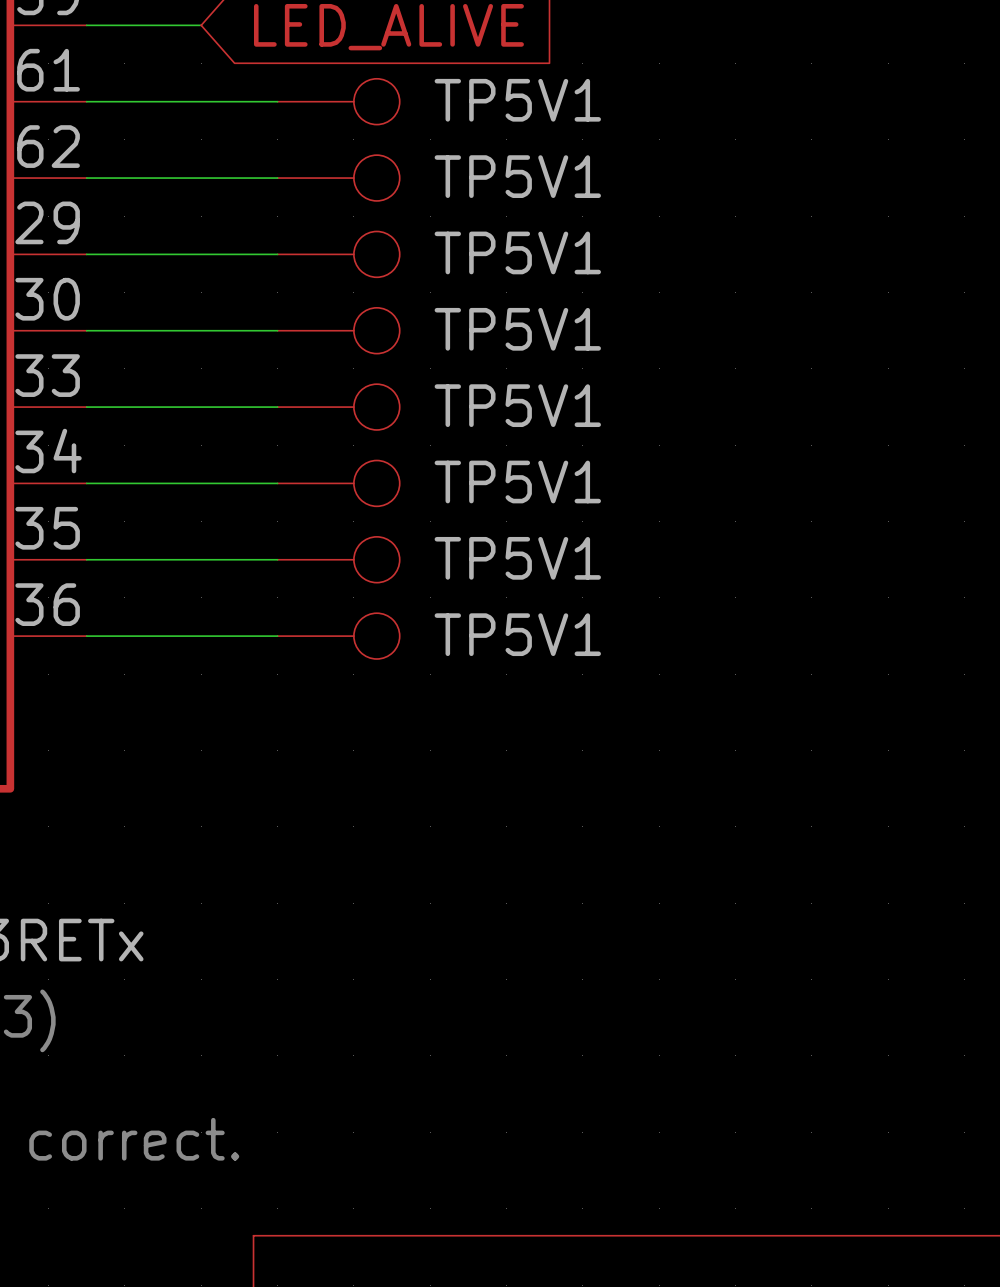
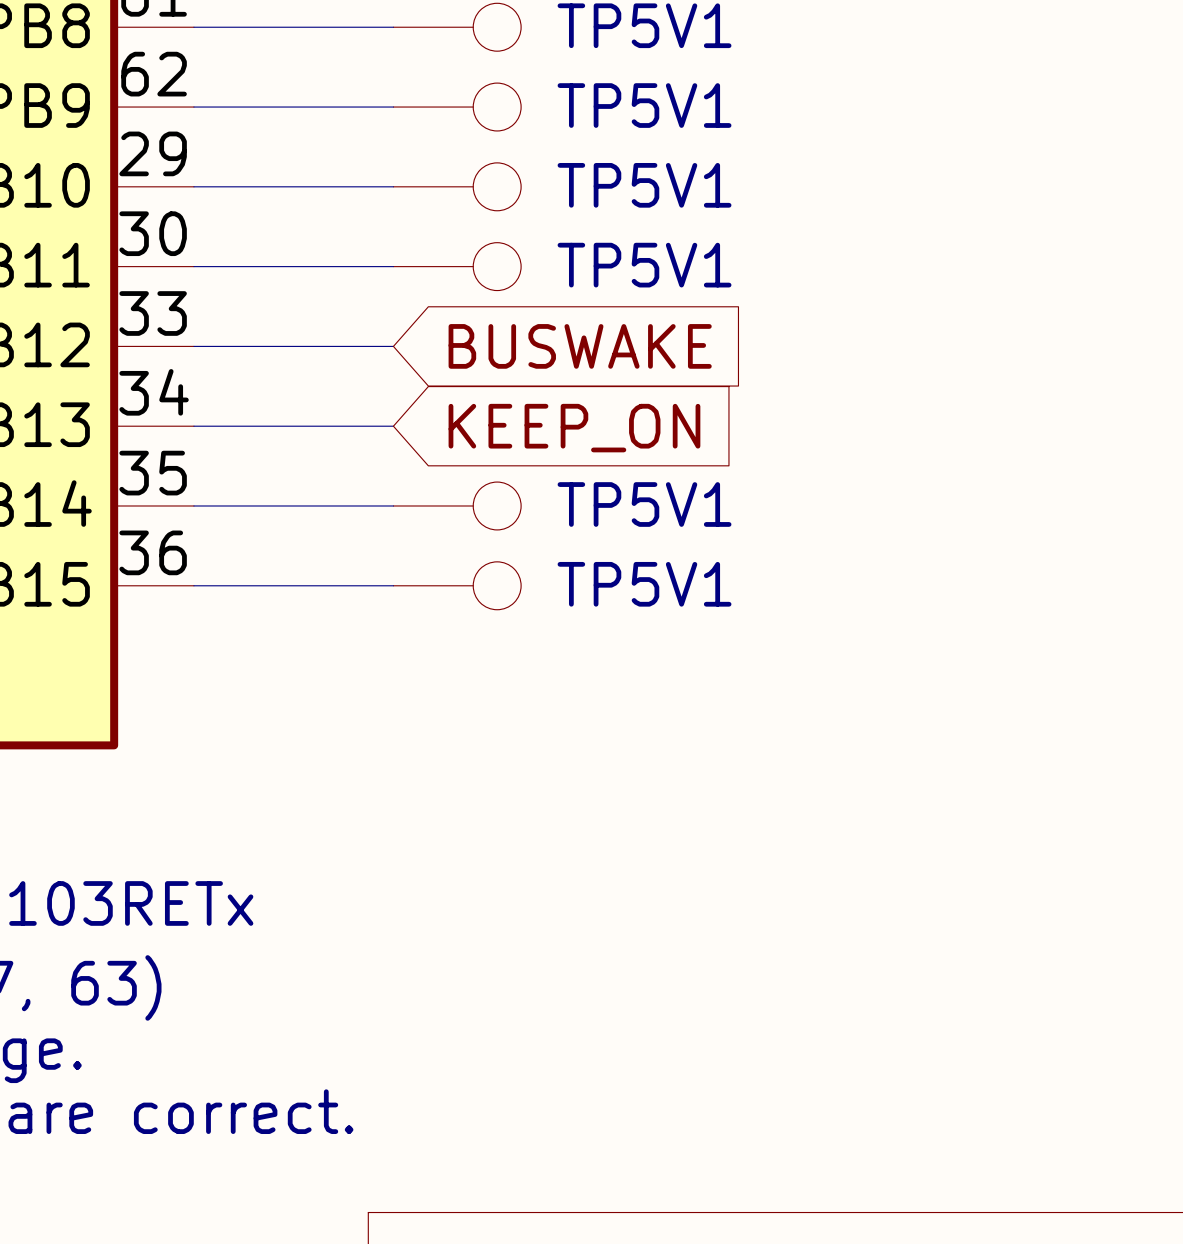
TP5V1: (338, 407) -> none
global label: none -> BUSWAKE (580, 346)
TP5V1: (338, 483) -> none
global label: none -> KEEP_ON (574, 428)

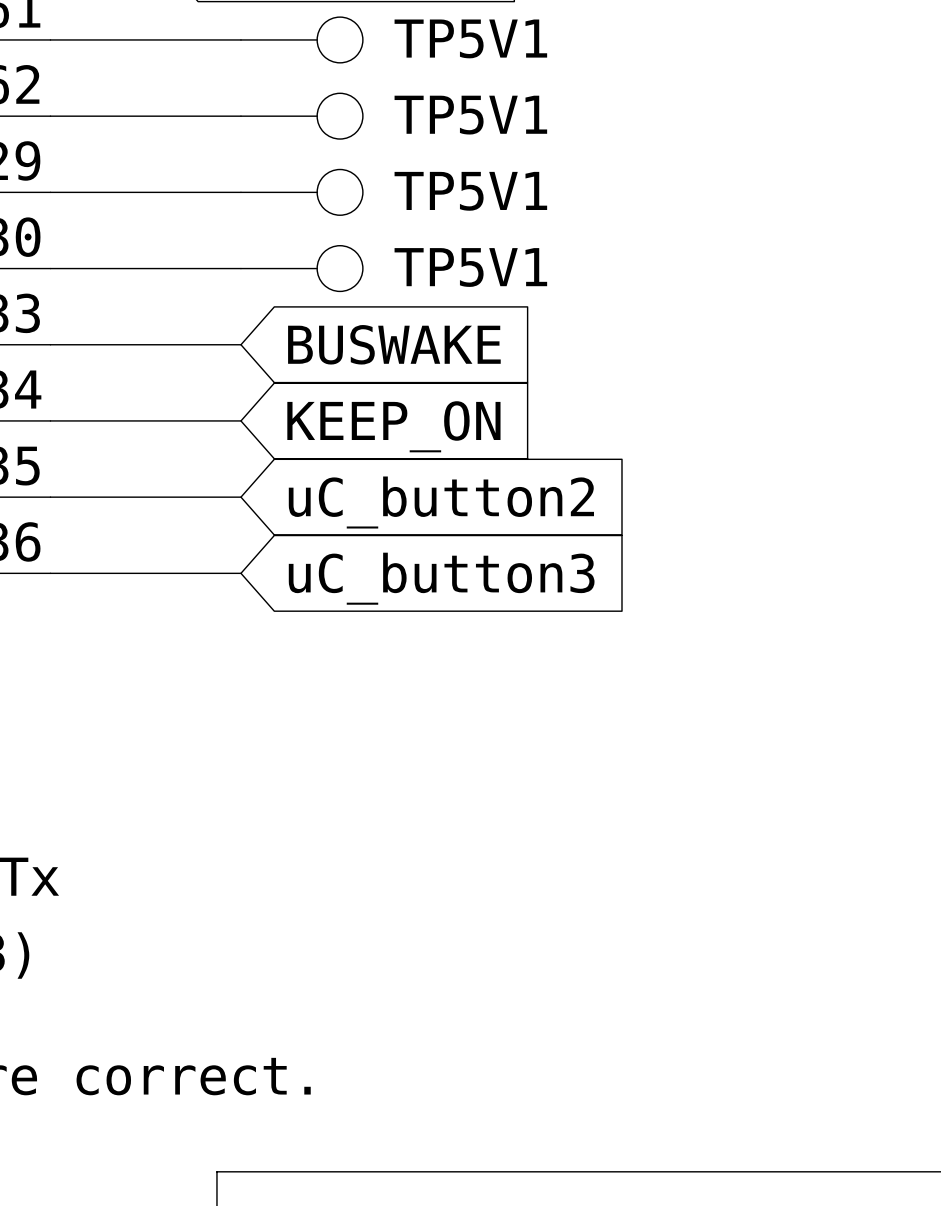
TP5V1: (457, 505) -> none
global label: none -> uC_button2 (441, 502)
TP5V1: (457, 585) -> none
global label: none -> uC_button3 (441, 578)

